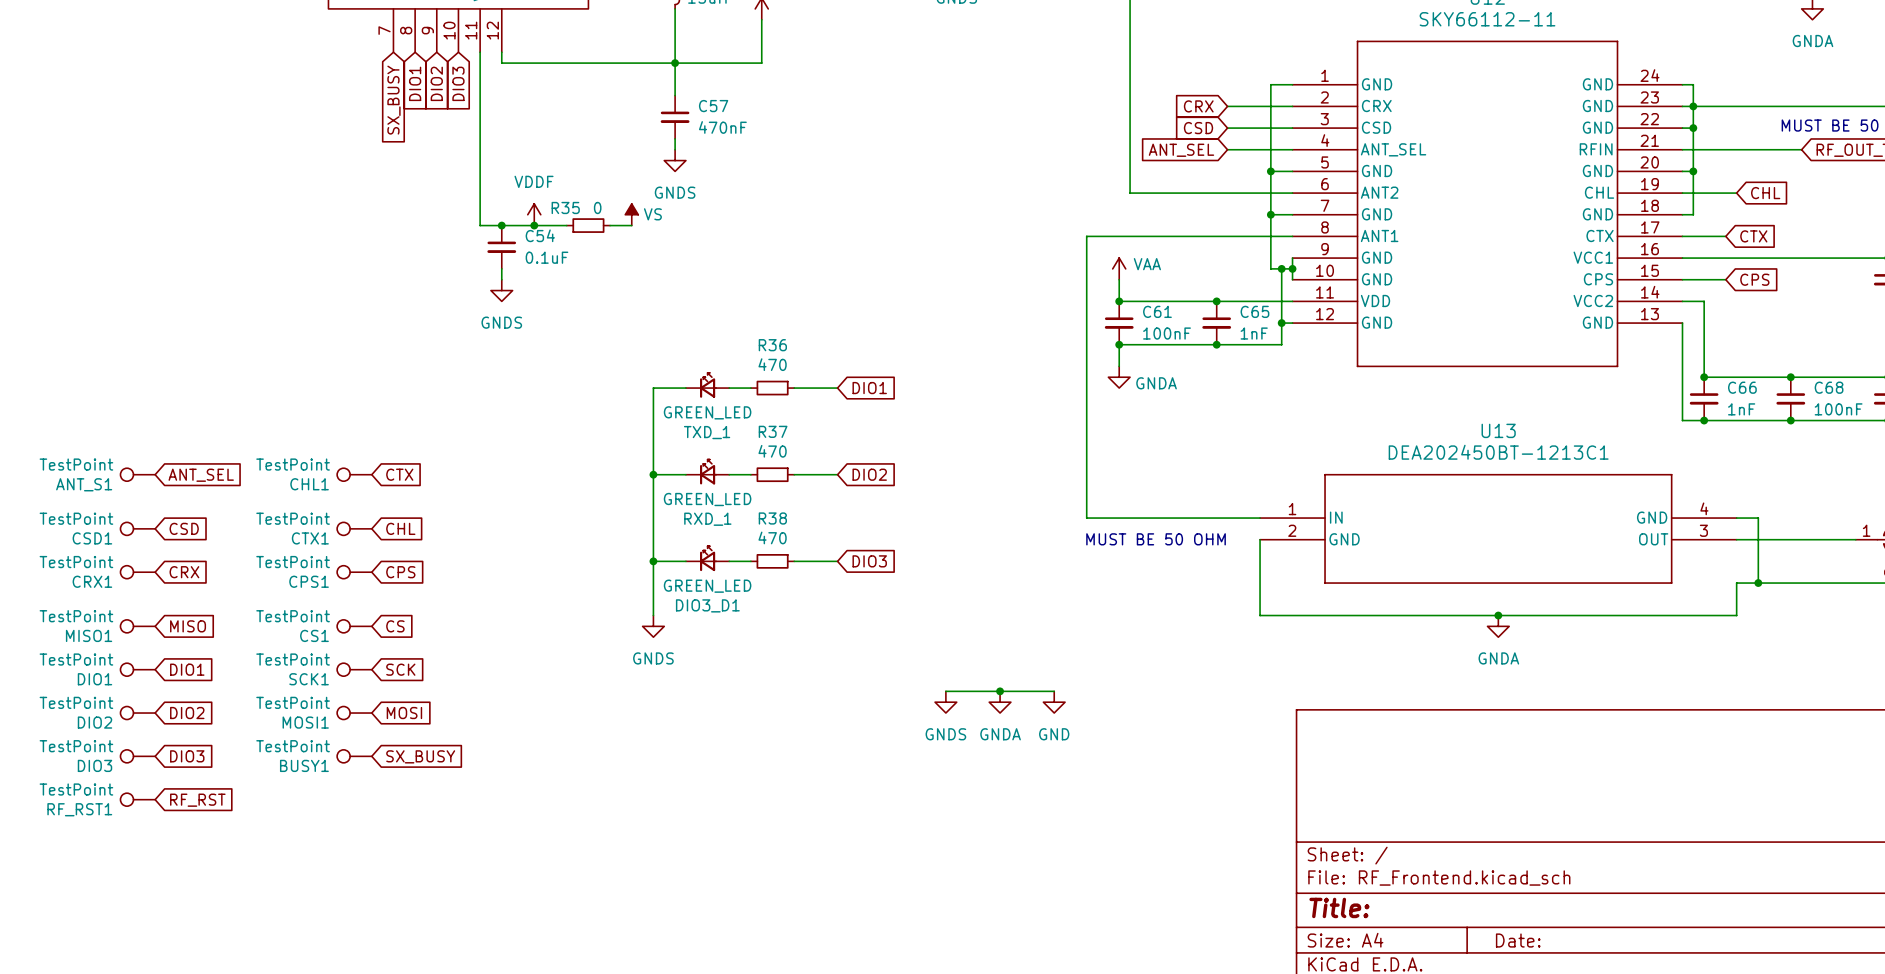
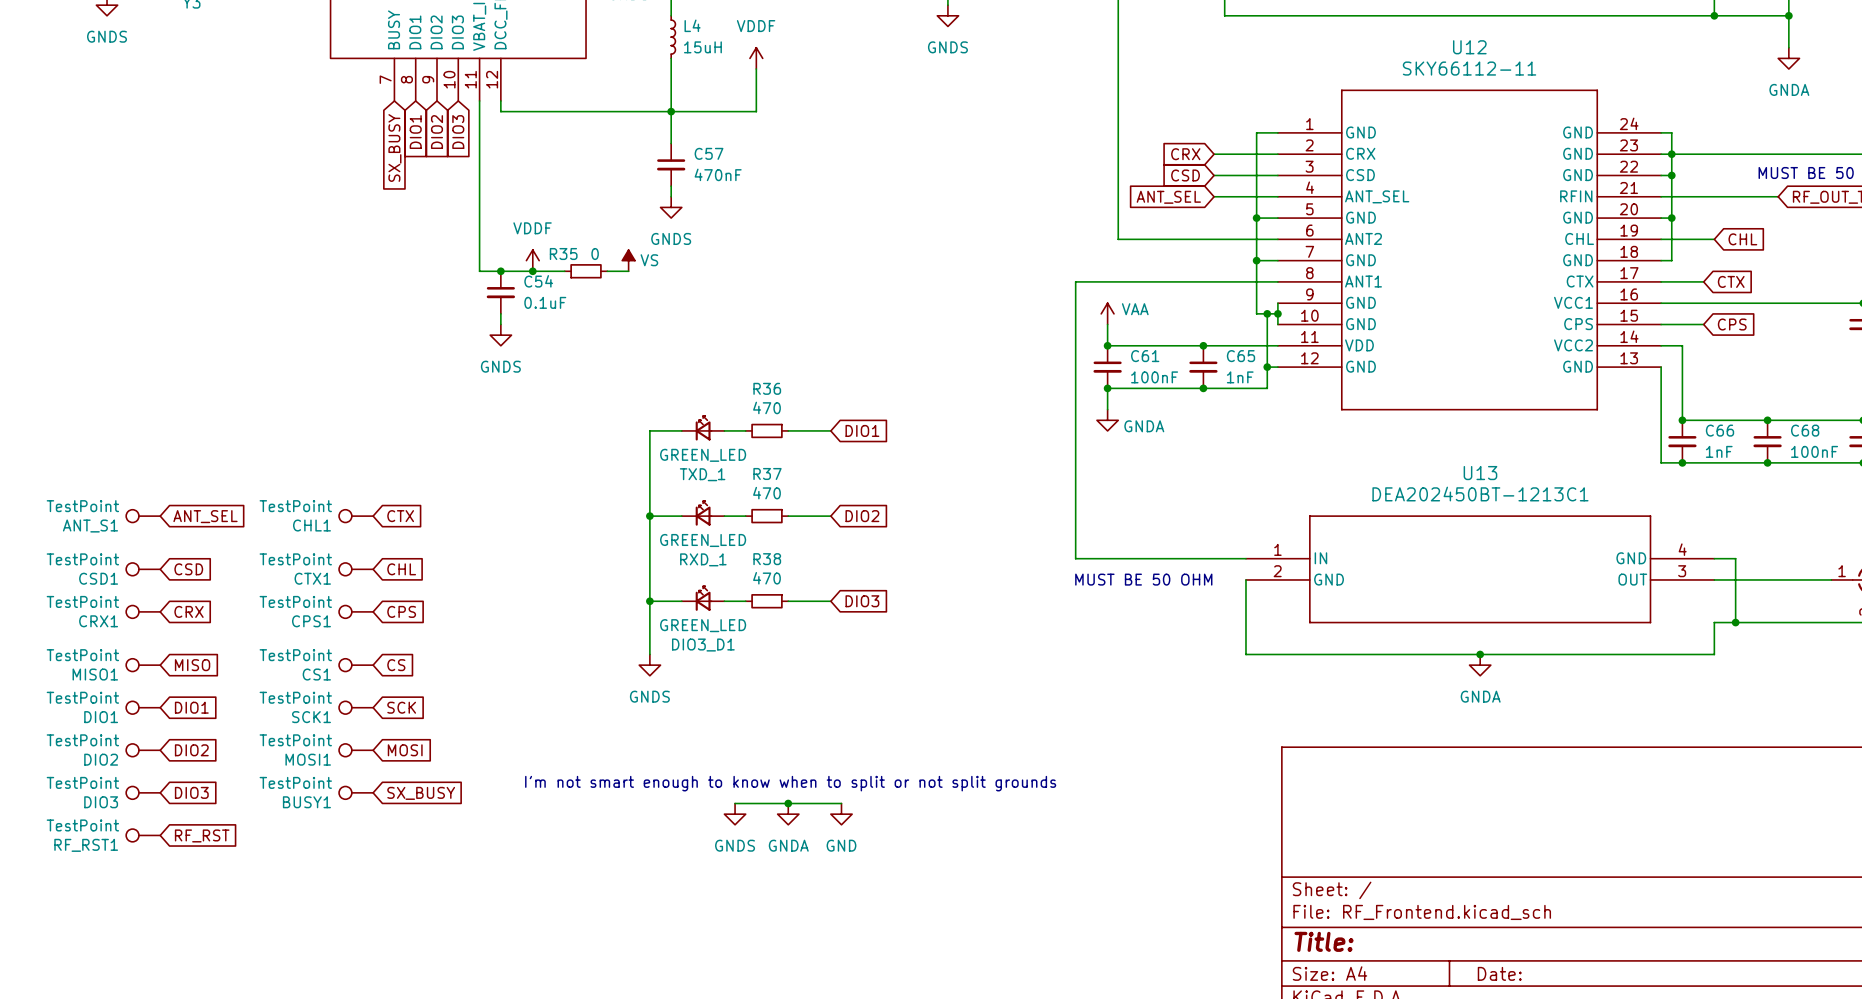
wire: (945, 691) (1054, 691) -> none
junction: (1000, 691) -> none
power symbol: GNDS (945, 702) -> none
power symbol: GNDA (1000, 702) -> none
power symbol: GND (1054, 702) -> none
text: none -> I'm not smart enough to know when to split or not split grounds (790, 783)
wire: none -> (735, 803) (841, 803)
junction: none -> (788, 803)
power symbol: none -> GNDS (735, 814)
power symbol: none -> GNDA (788, 814)
power symbol: none -> GND (841, 814)

